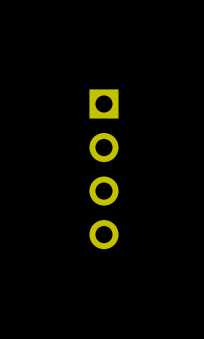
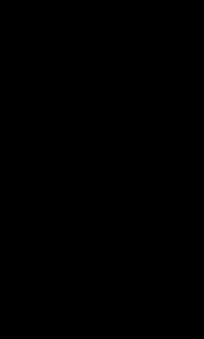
part: (103, 169) -> none

